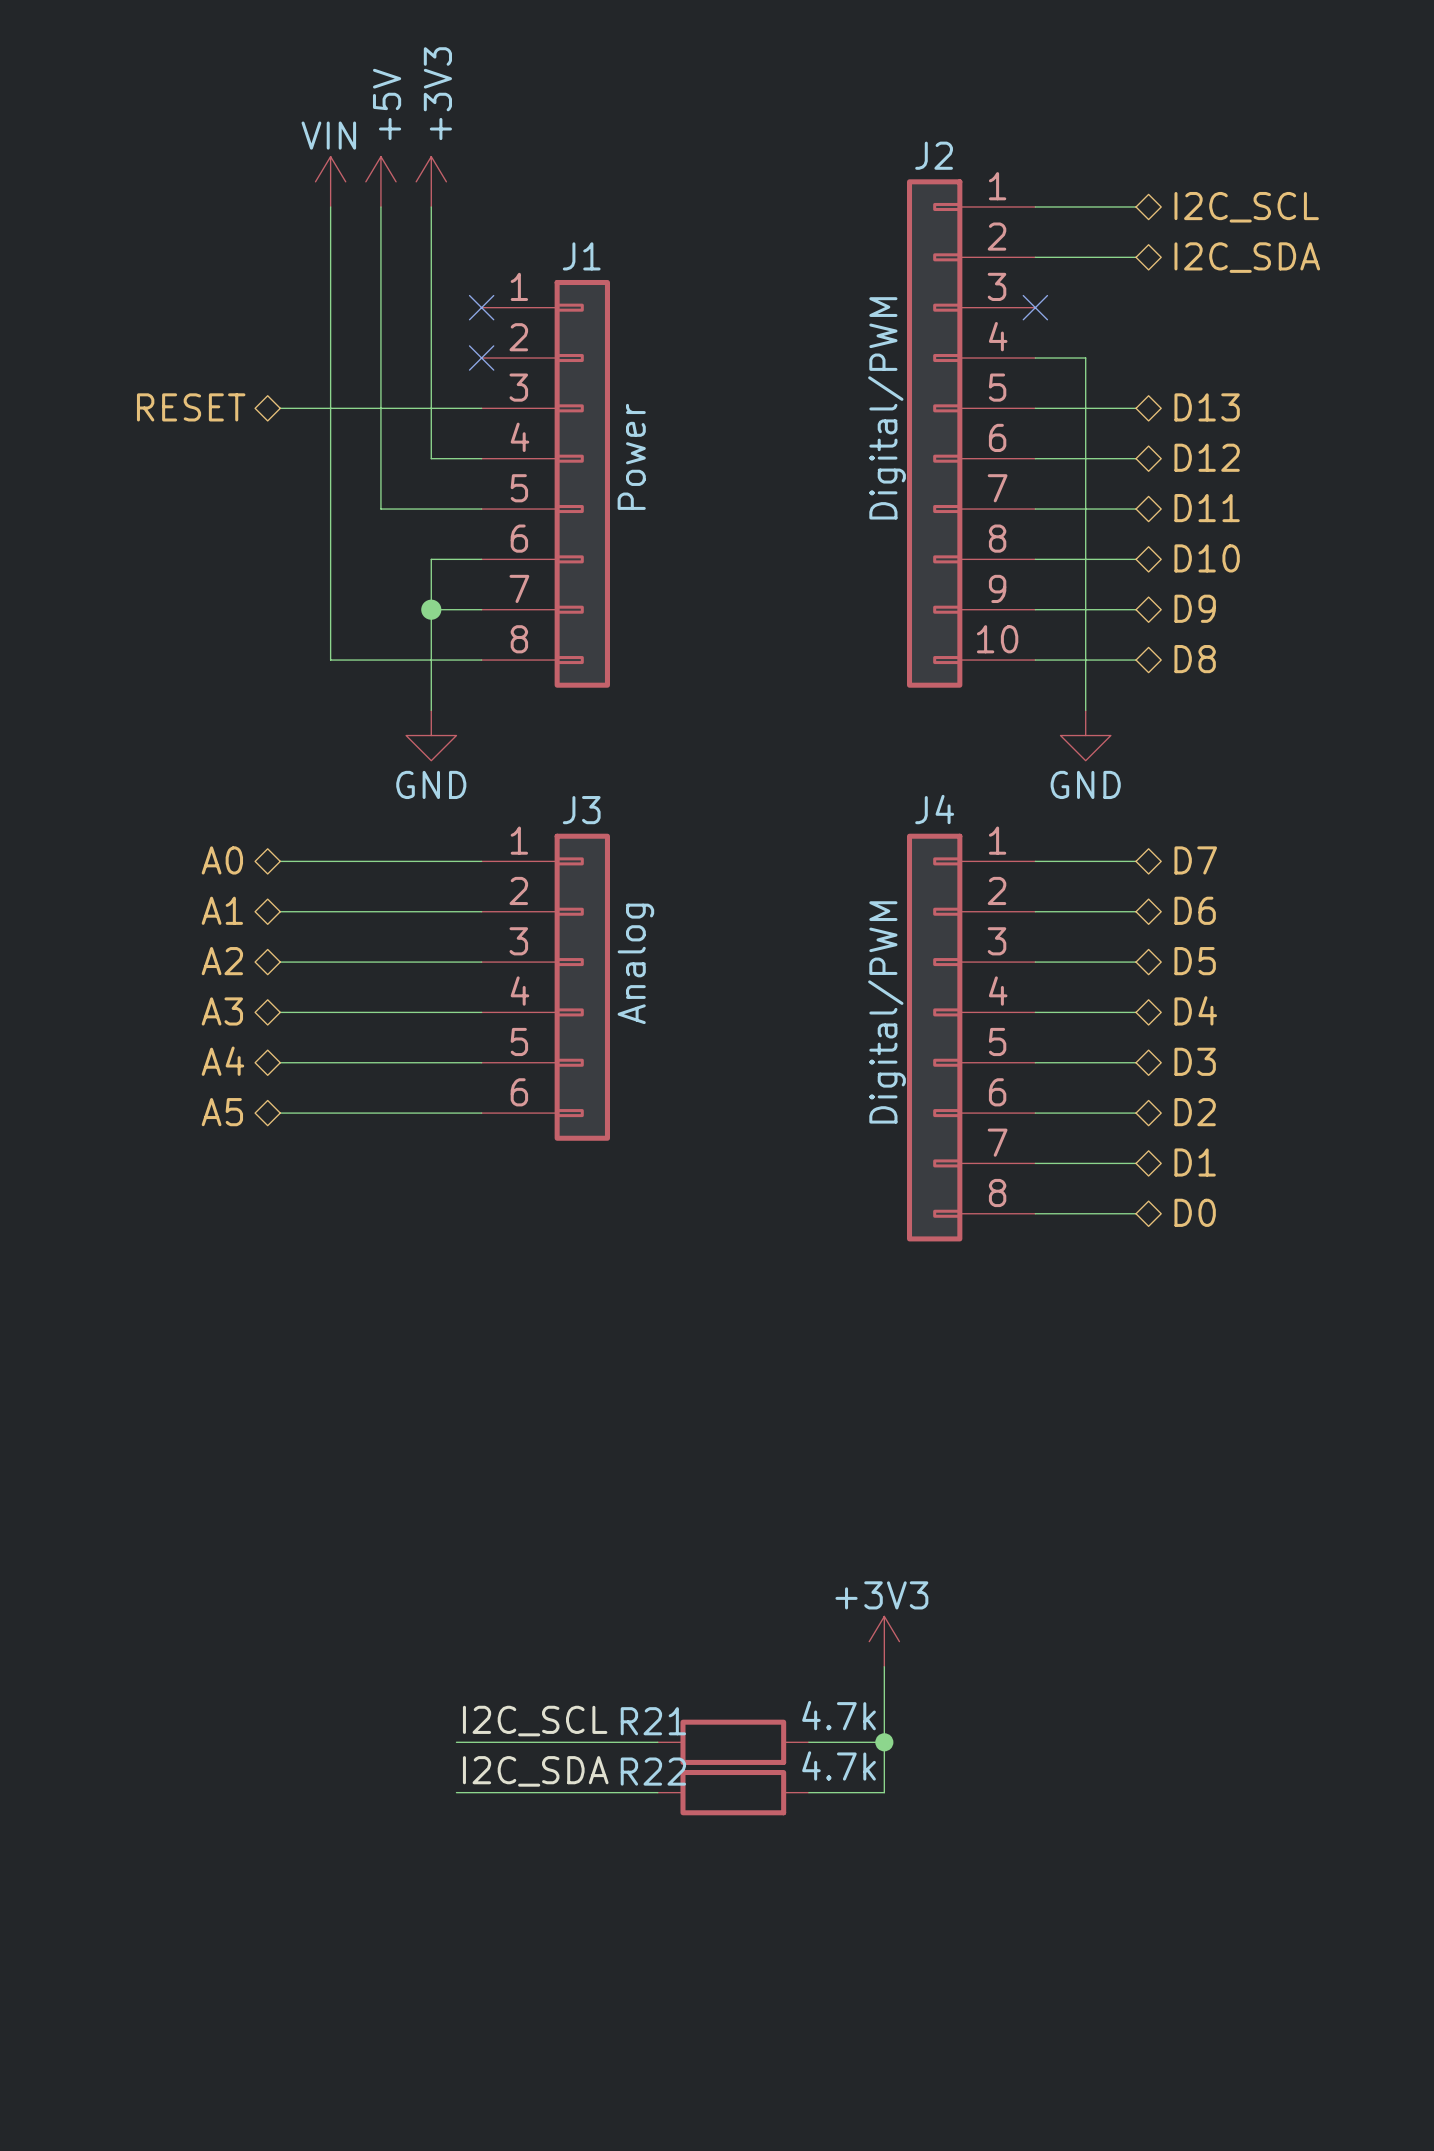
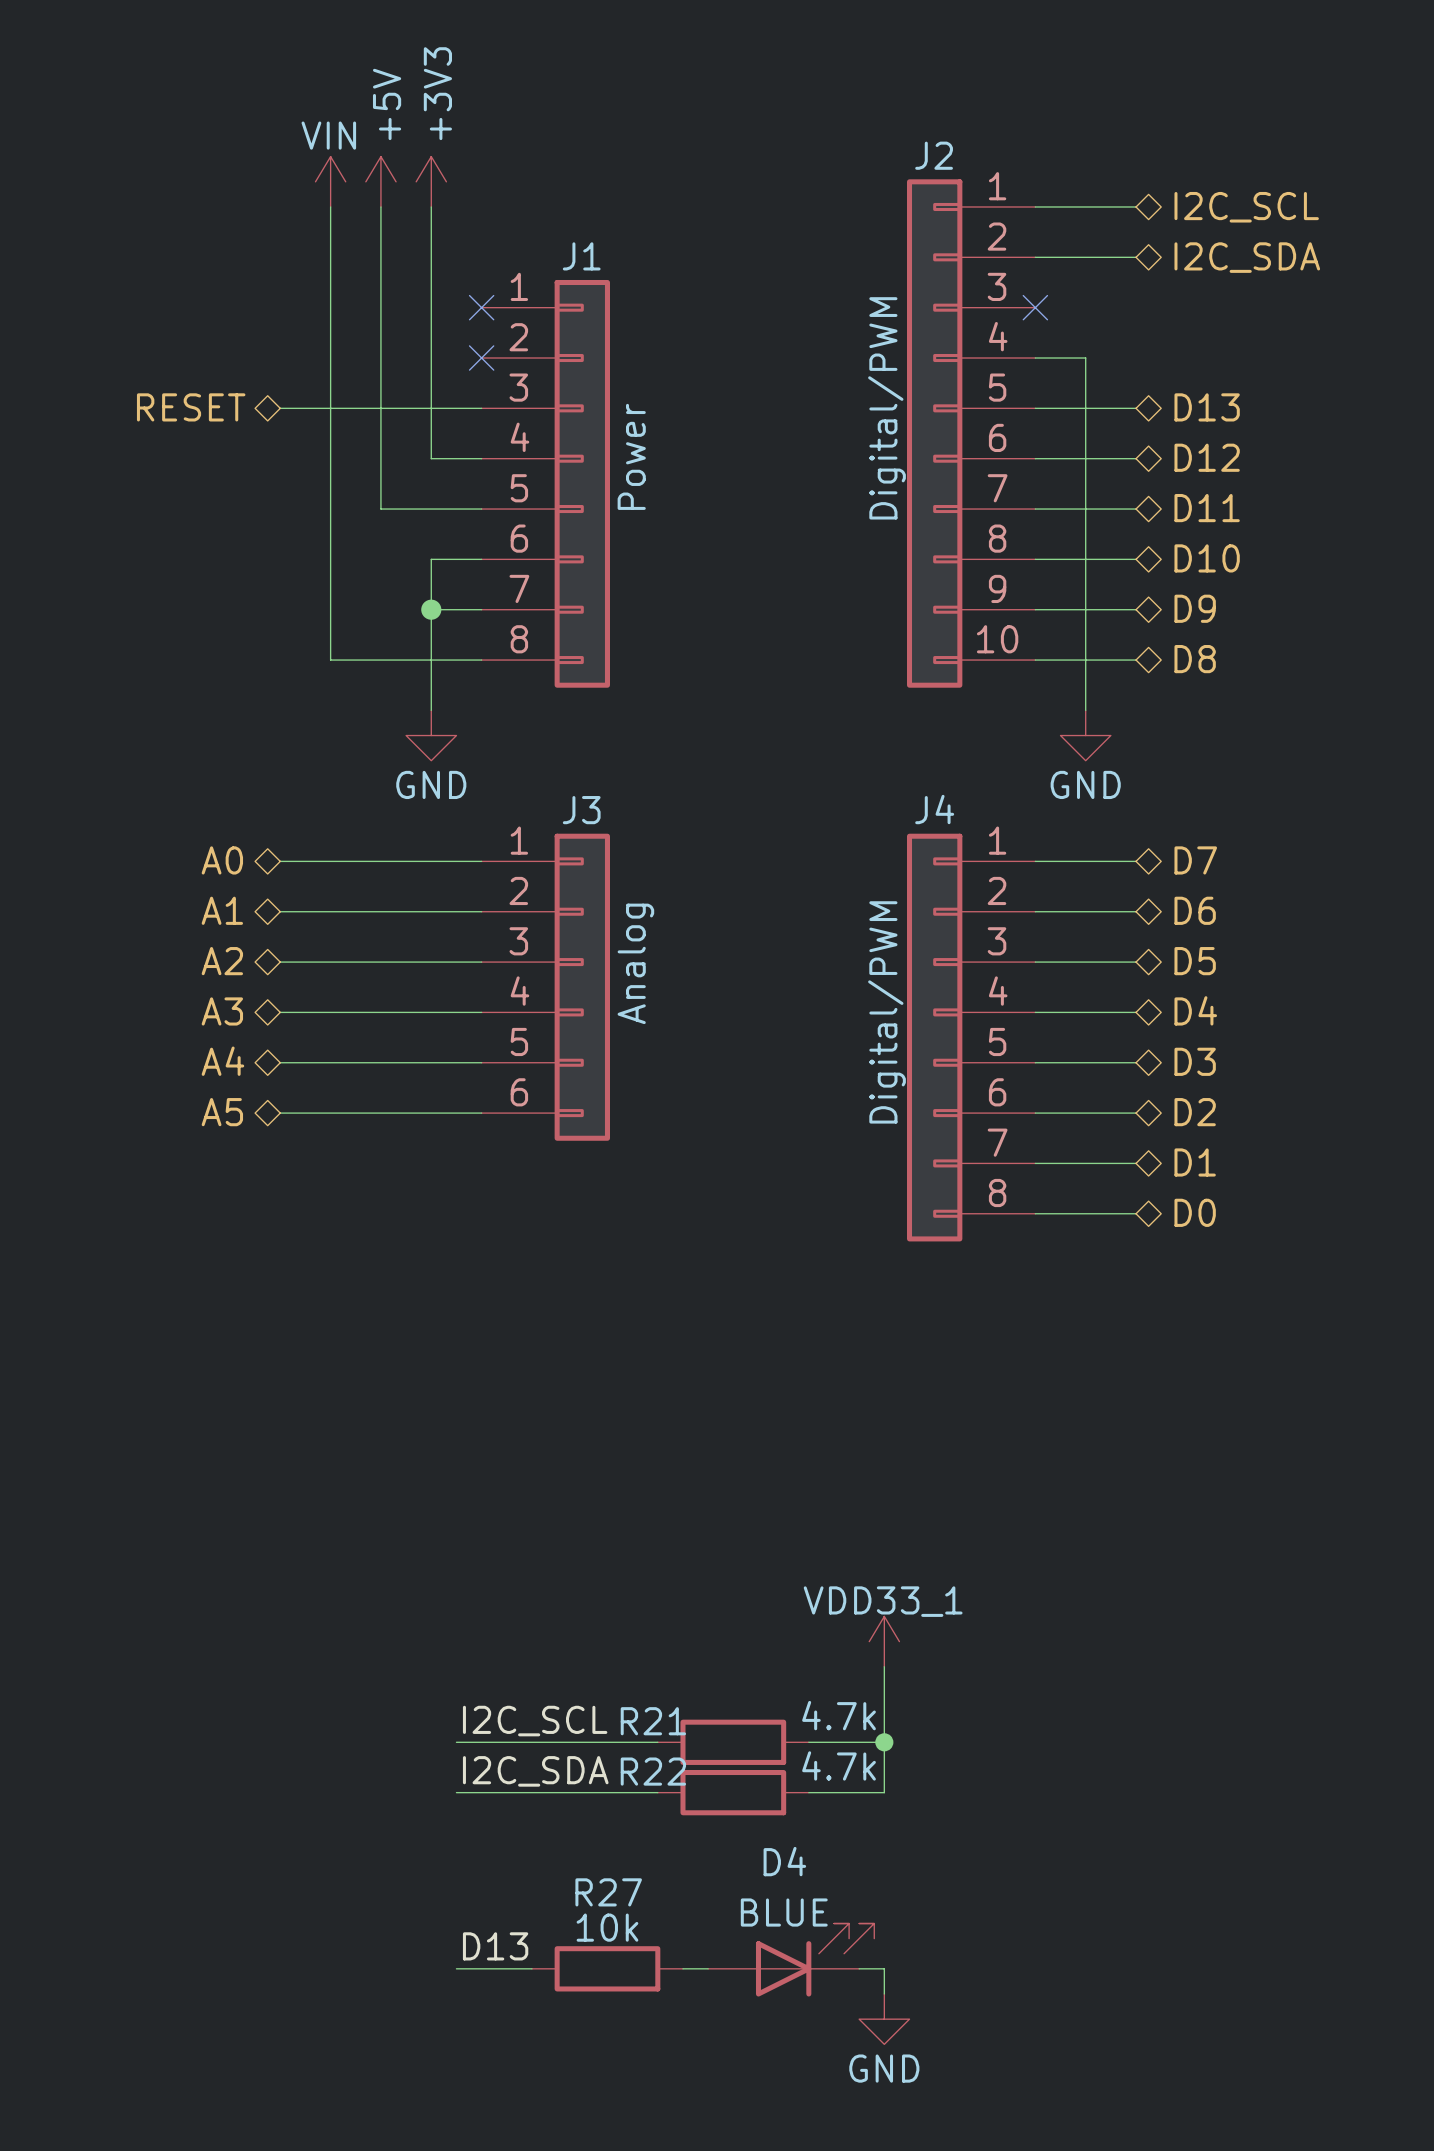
power symbol: +3V3 (884, 1641) -> VDD33_1 (884, 1641)
label: none -> D13 (495, 1946)
D4: none -> BLUE (791, 1960)
wire: none -> (456, 1968) (531, 1968)
R27: none -> 10k (607, 1968)
wire: none -> (682, 1968) (708, 1968)
wire: none -> (859, 1968) (884, 1968) (884, 1994)
power symbol: none -> GND (884, 2019)

